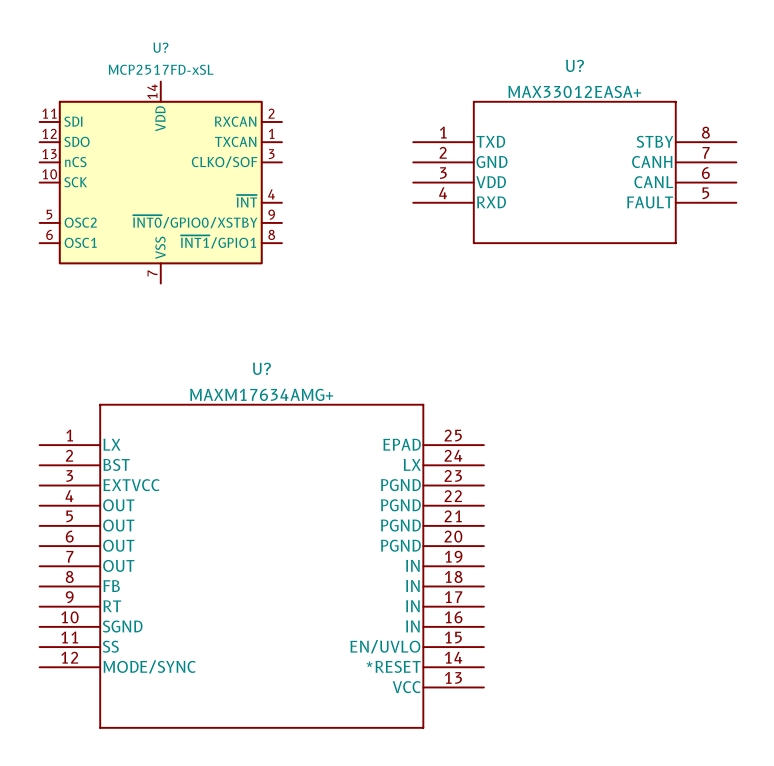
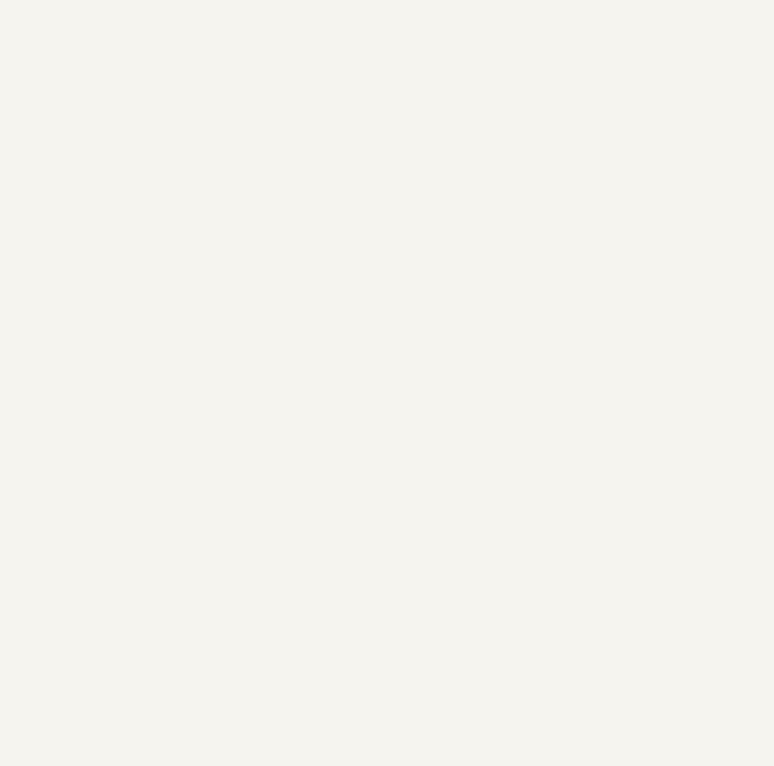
U?: MAX33012EASA+ (574, 172) -> none
U?: MCP2517FD-xSL (160, 182) -> none
U?: MAXM17634AMG+ (261, 566) -> none

